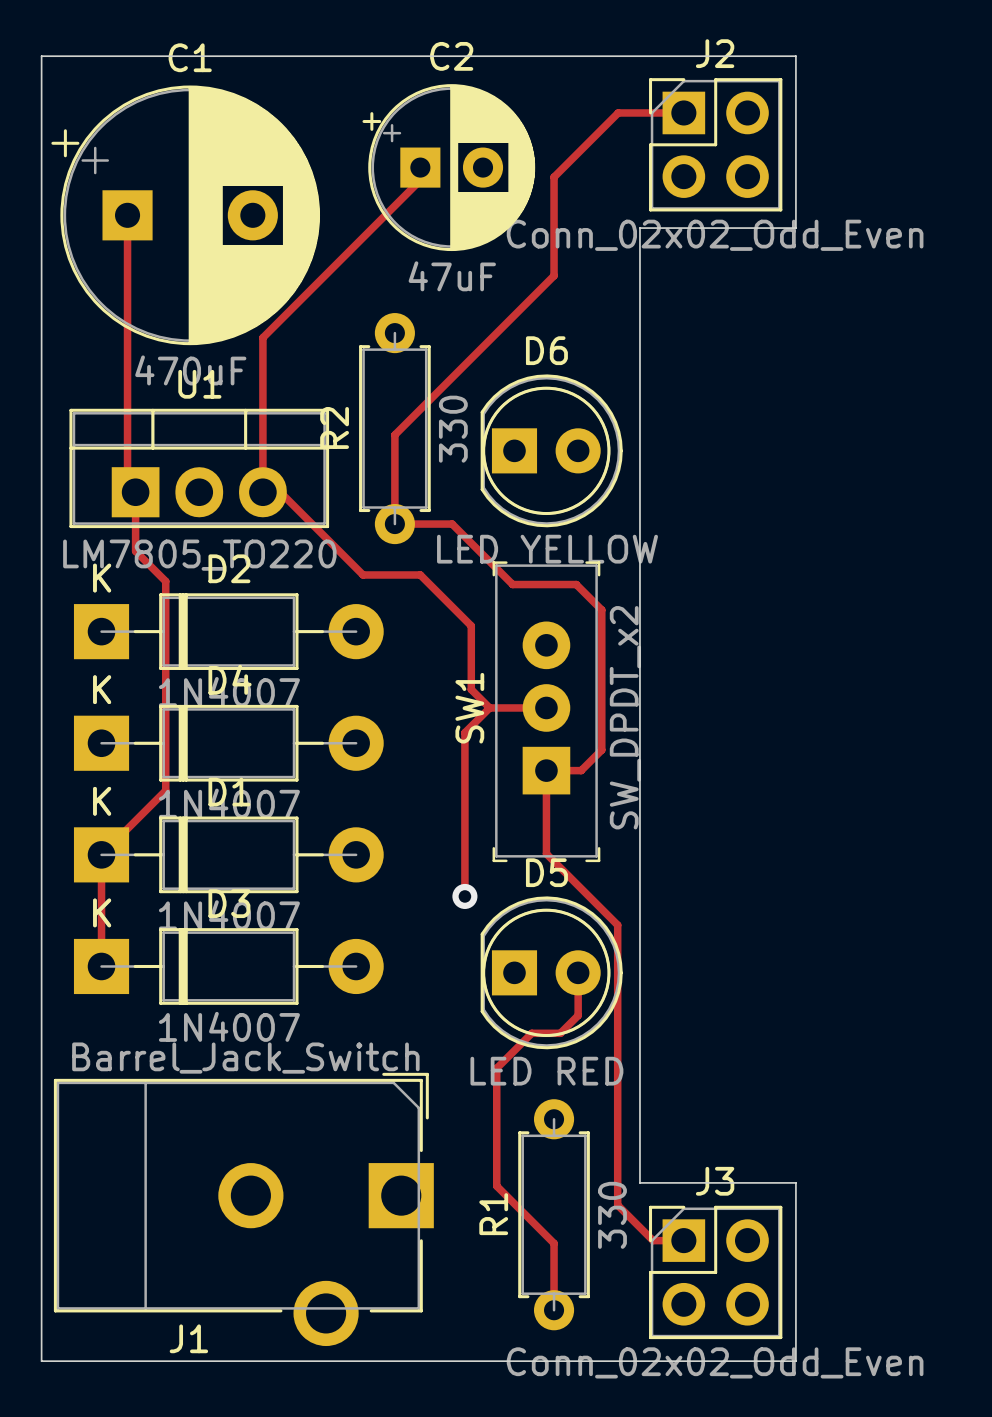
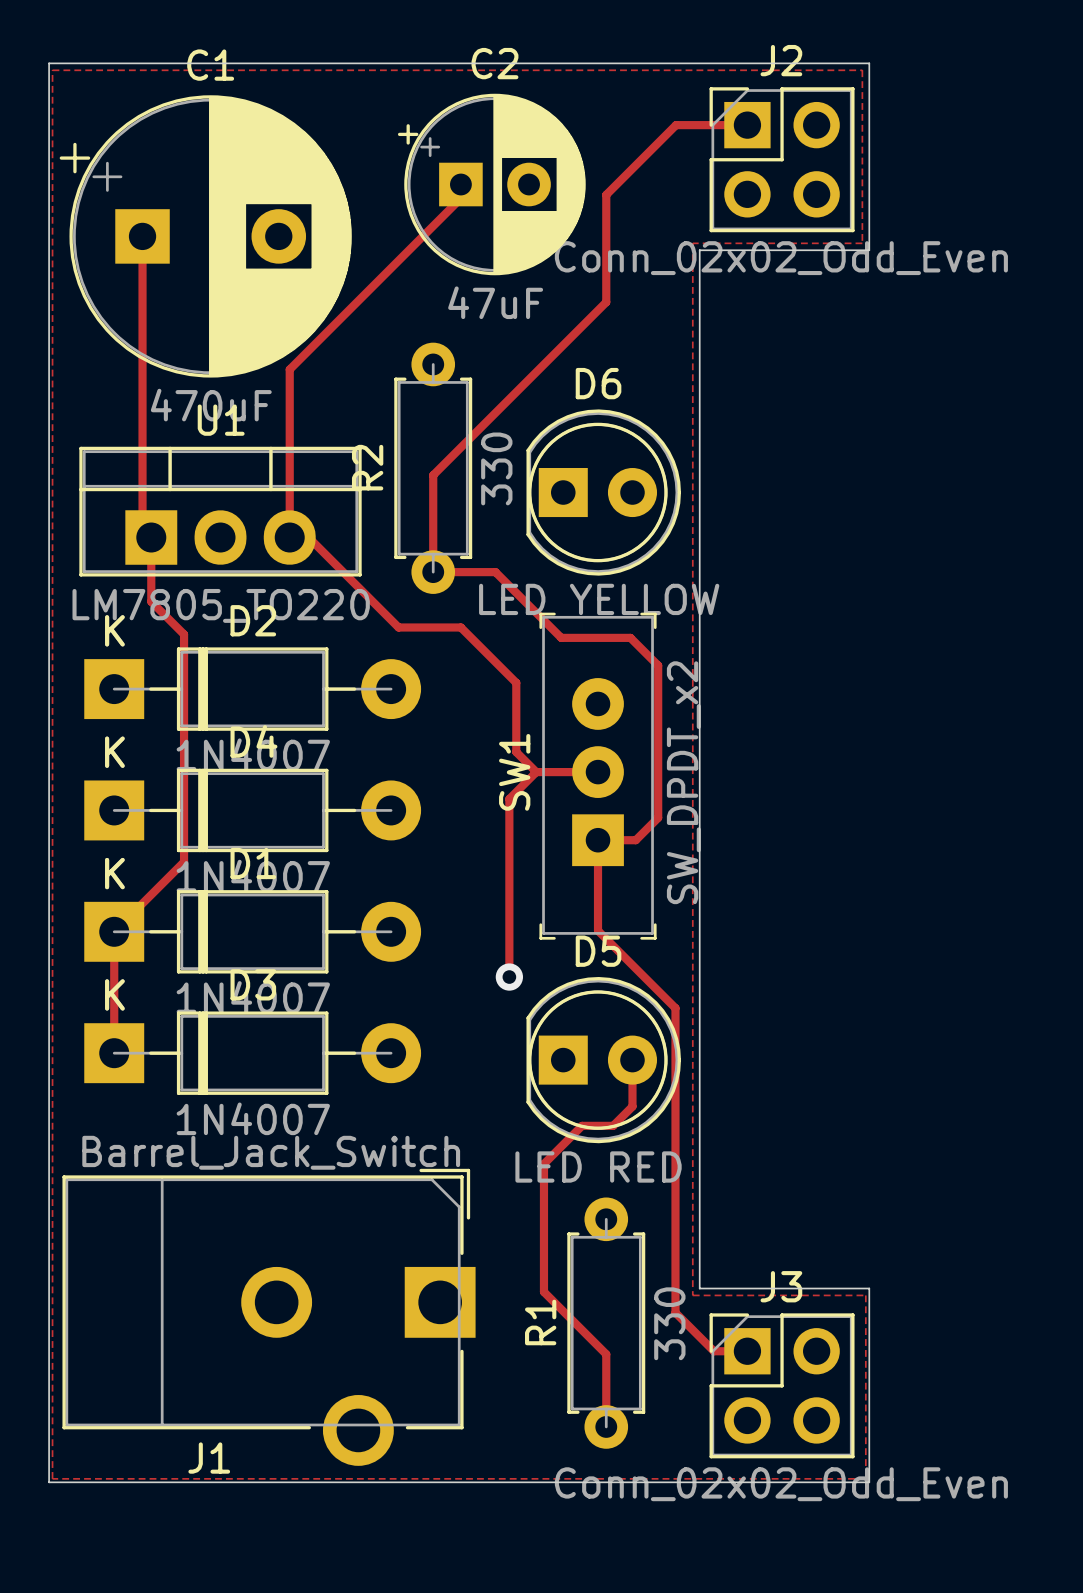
zone outline: none -> (52, 70) (52, 1478) (865, 1478) (865, 1295) (692, 1295) (692, 243) (862, 243) (862, 70) (52, 70)

